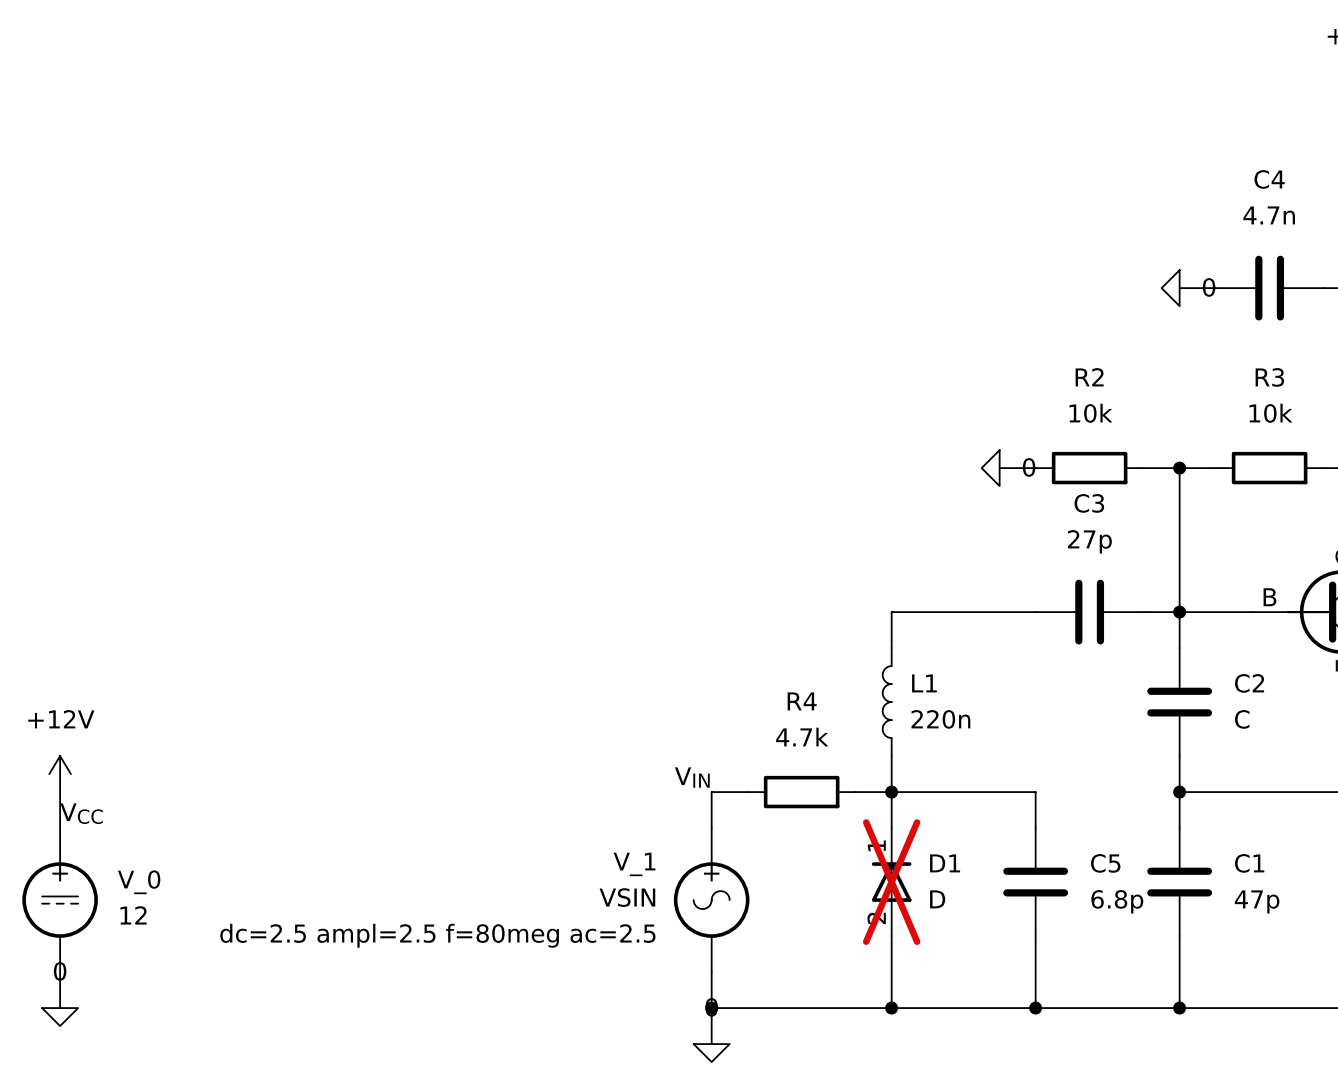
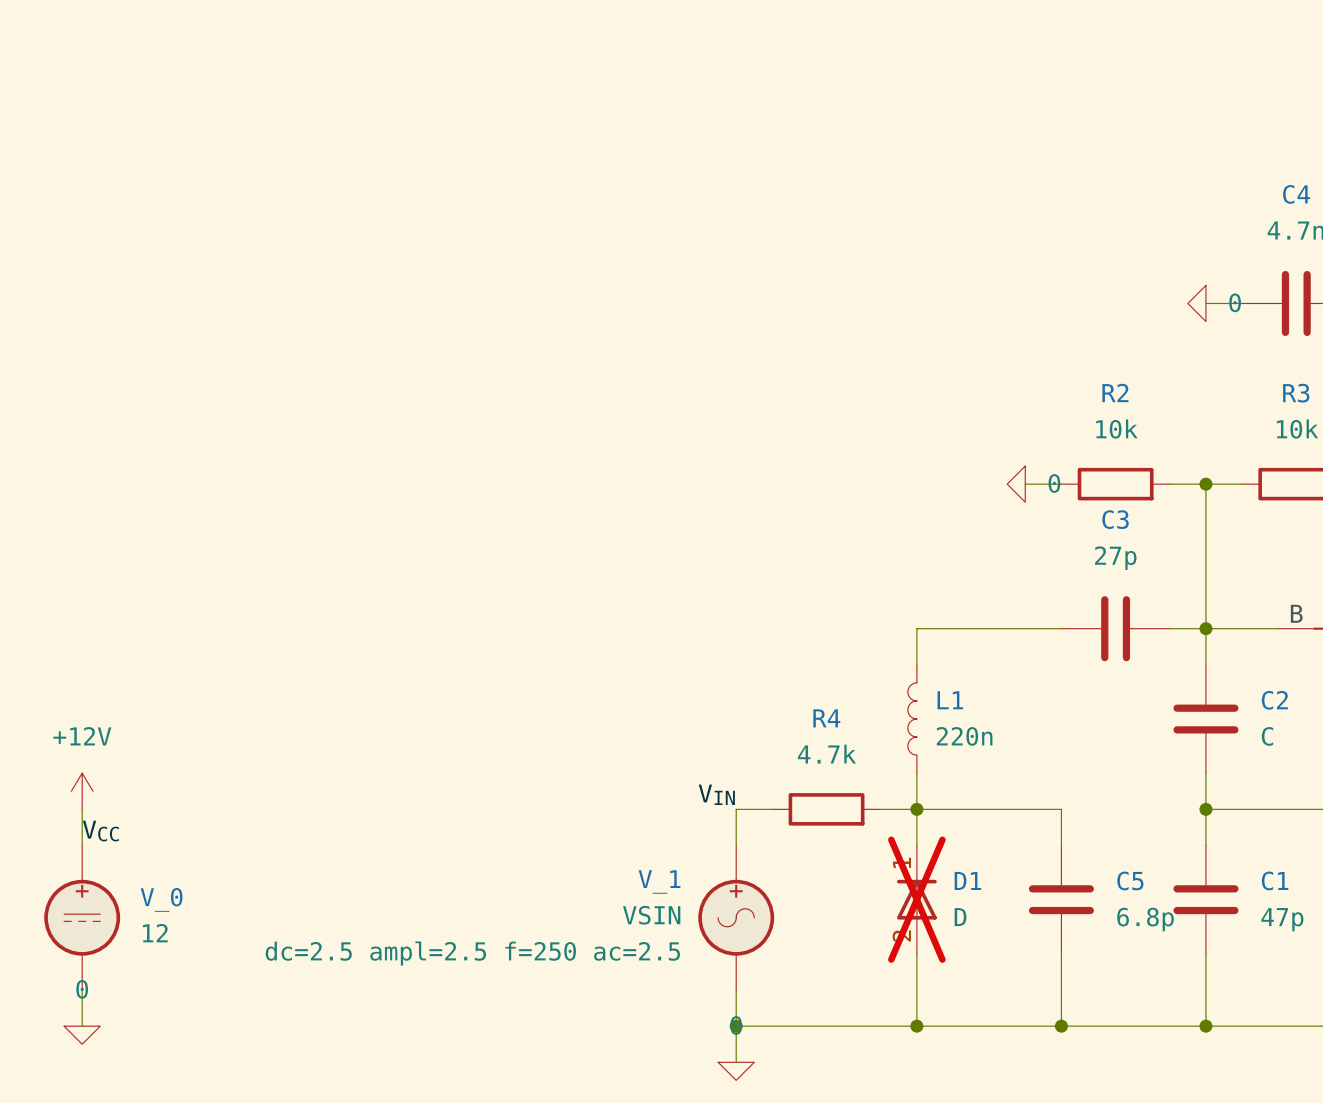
V_1 text: dc=2.5 ampl=2.5 f=80meg ac=2.5 (437, 935) -> dc=2.5 ampl=2.5 f=250 ac=2.5 (472, 953)

